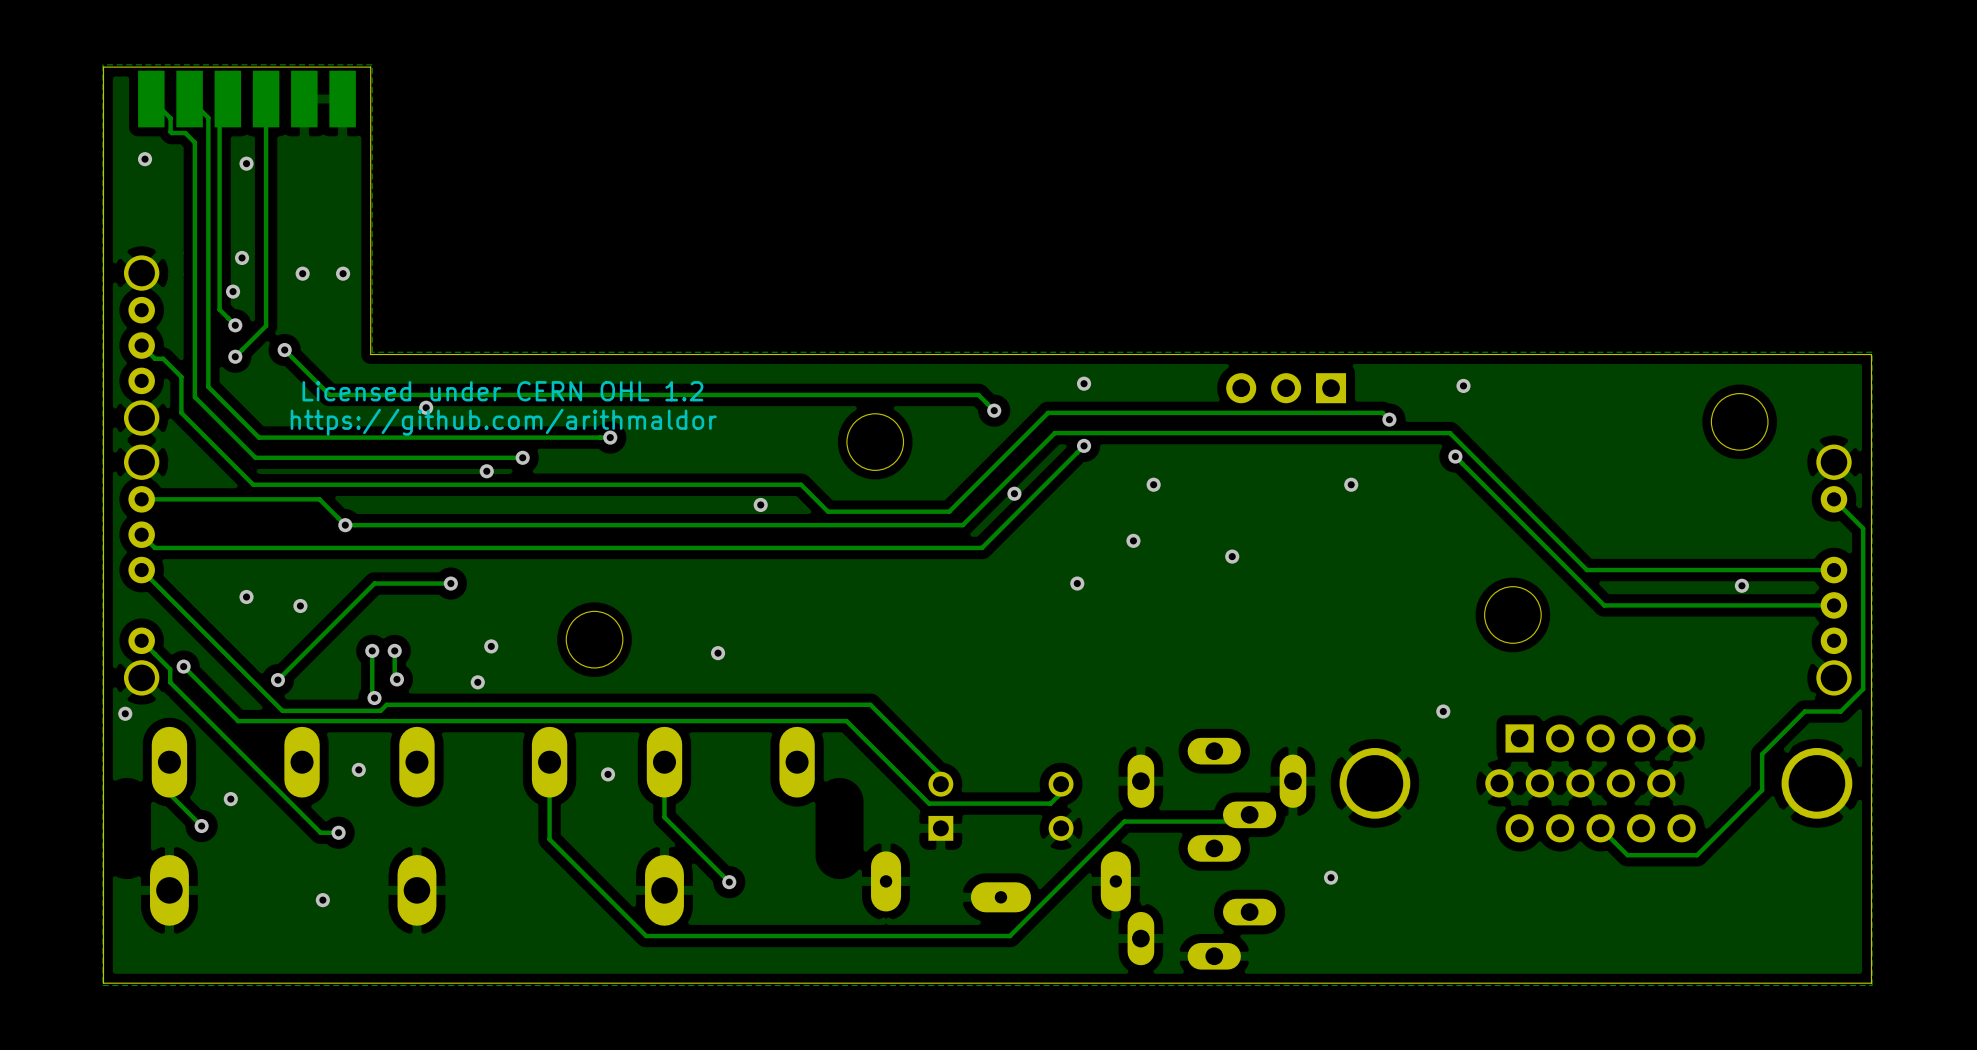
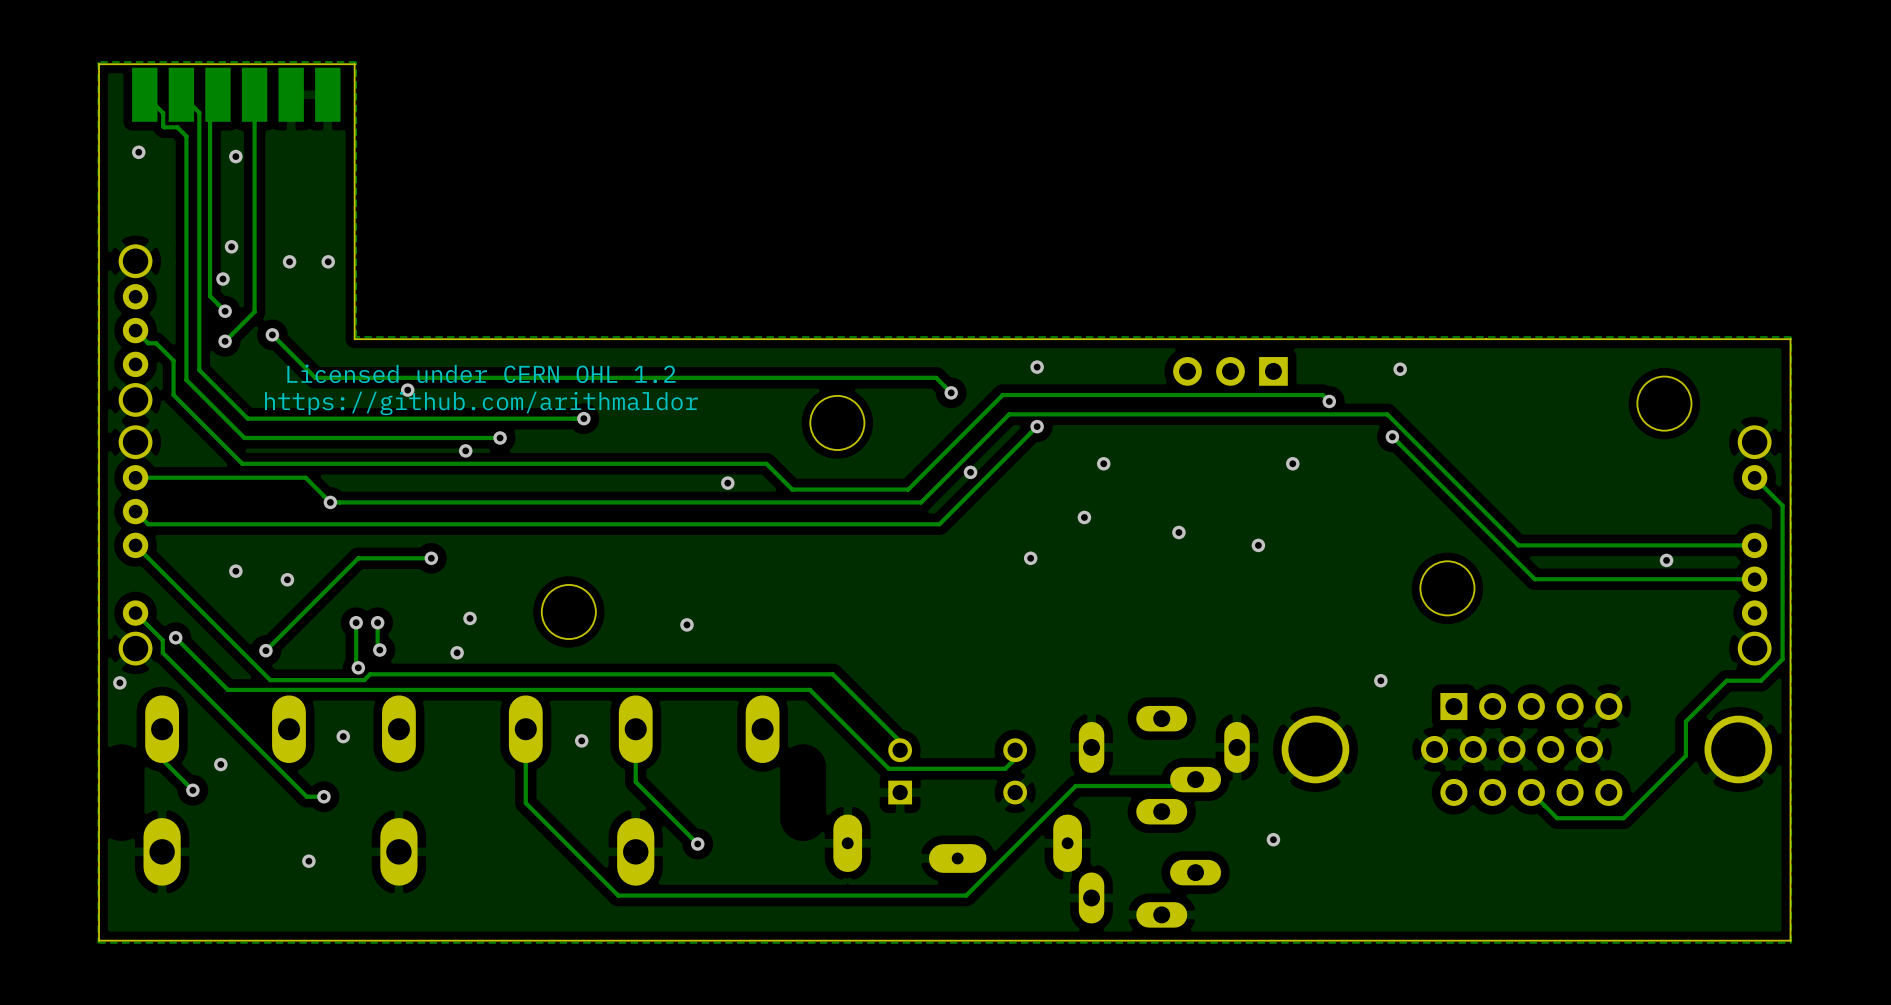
via: none -> (1258, 545)

